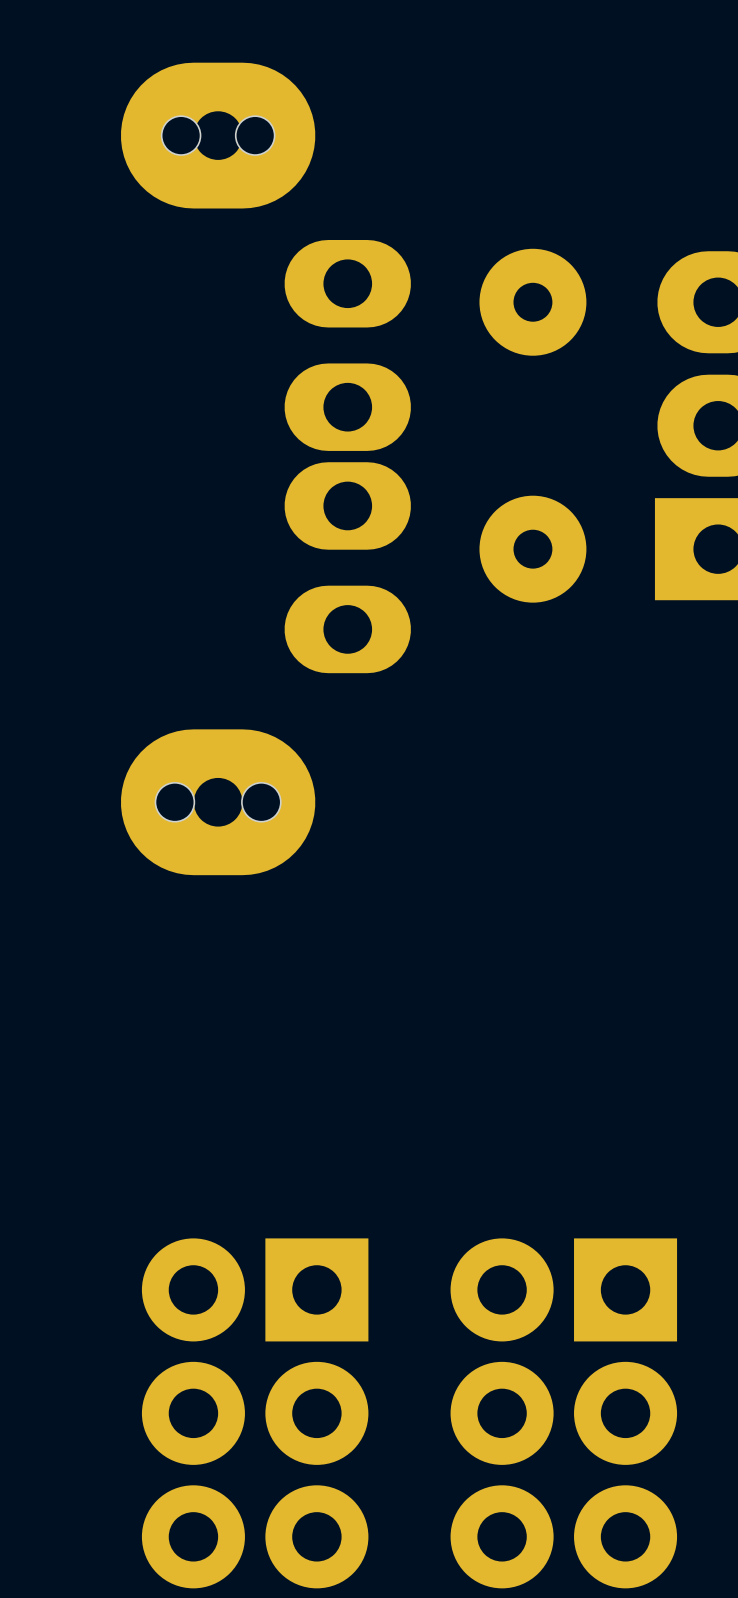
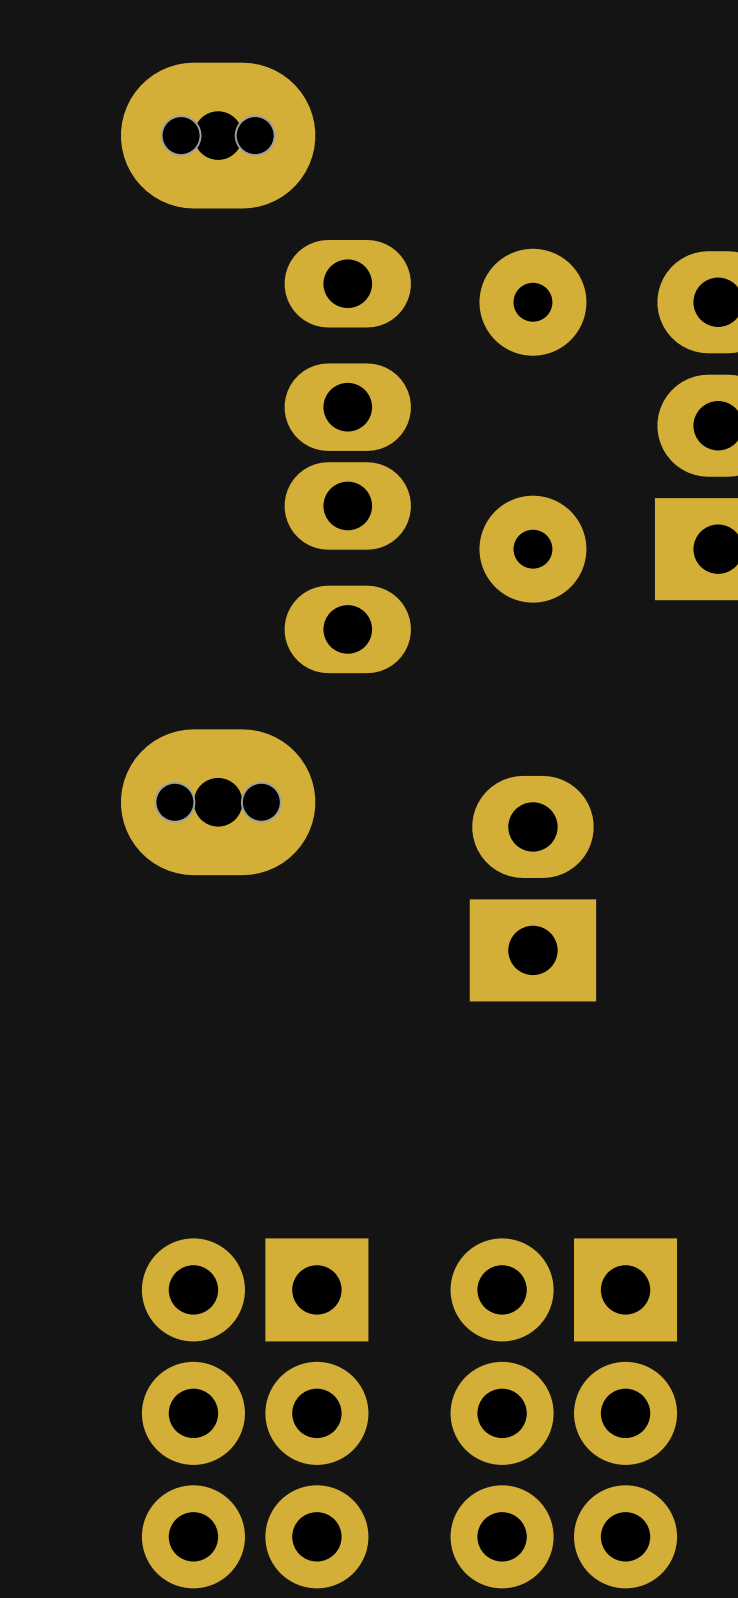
part: none -> (532, 888)

